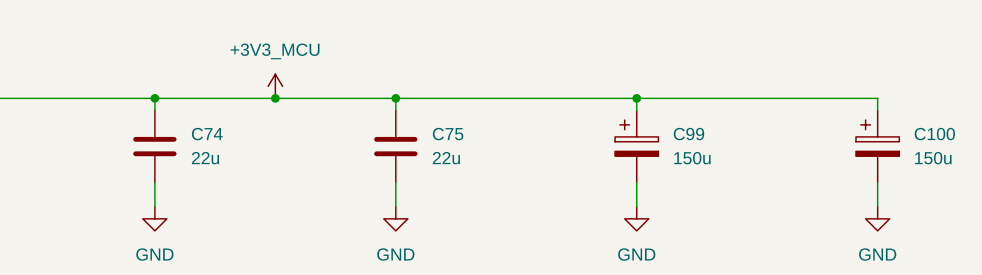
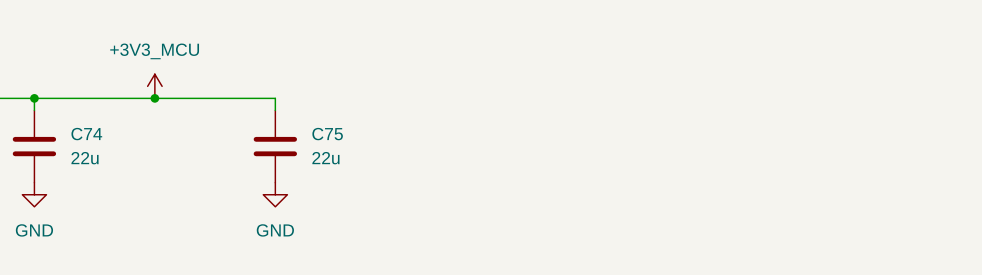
power symbol position: +3V3_MCU (275, 86) -> +3V3_MCU (154, 86)
junction: none -> (34, 98)
wire: (154, 98) (154, 110) -> (34, 98) (34, 110)
wire: (275, 98) (877, 98) (877, 110) -> (275, 98) (275, 110)
junction: (275, 98) -> none
wire: (395, 98) (395, 110) -> none
junction: (395, 98) -> none
wire: (636, 98) (636, 110) -> none
junction: (636, 98) -> none
C74 position: (154, 146) -> (34, 146)
C75 position: (395, 146) -> (275, 146)
C99: 150u (636, 146) -> none
C100: 150u (877, 146) -> none
wire: (154, 182) (154, 206) -> none
wire: (395, 182) (395, 206) -> none
wire: (636, 182) (636, 206) -> none
wire: (877, 182) (877, 206) -> none
power symbol: none -> GND (34, 194)
power symbol: none -> GND (275, 194)
power symbol: GND (154, 218) -> none
power symbol: GND (395, 218) -> none
power symbol: GND (636, 218) -> none
power symbol: GND (877, 218) -> none

